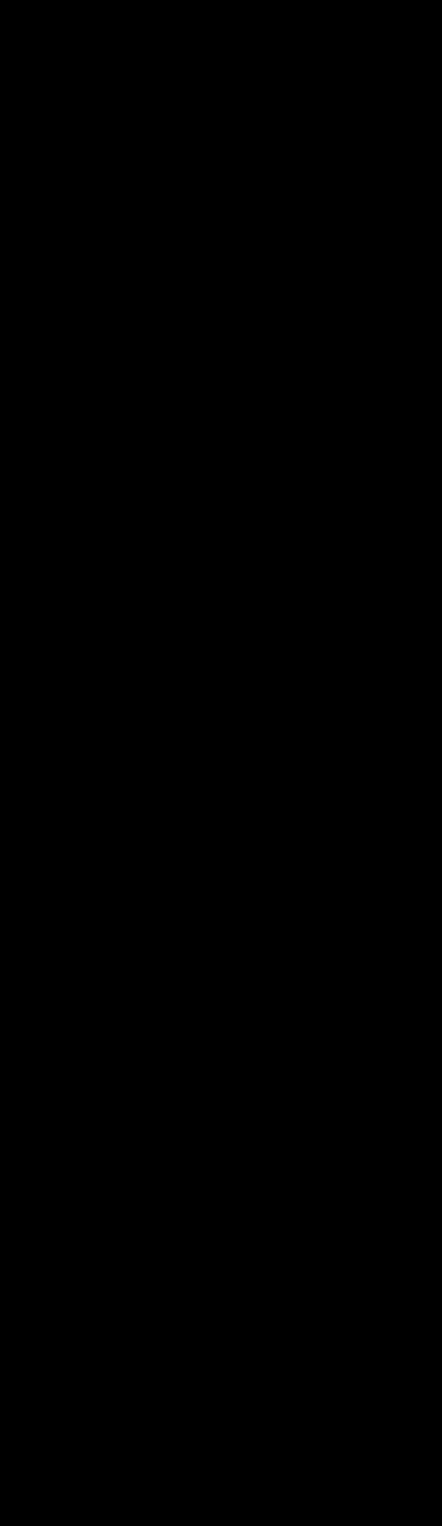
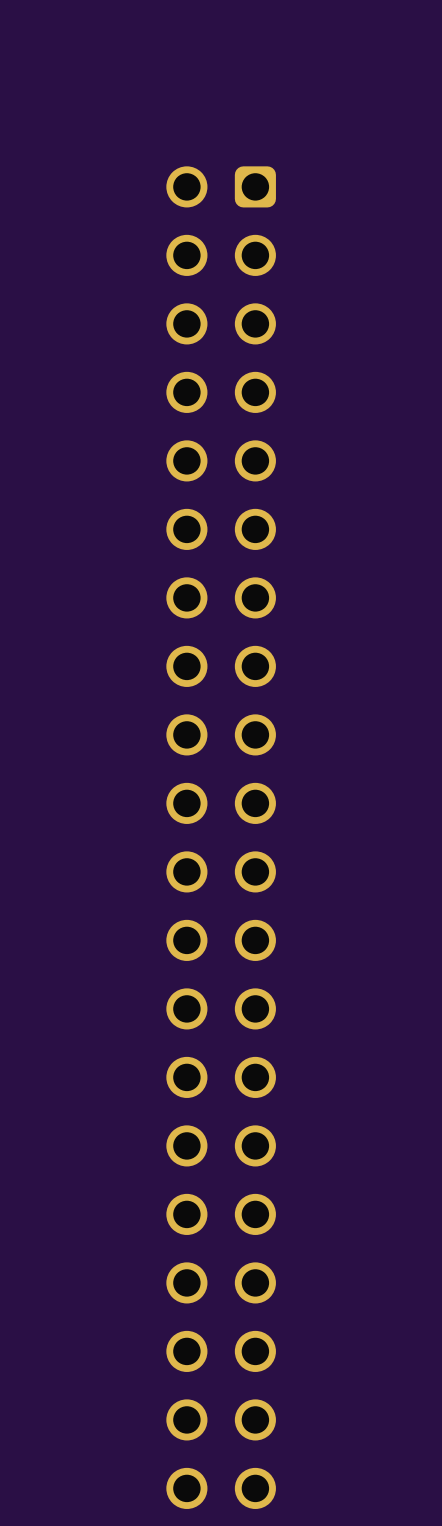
part: none -> (221, 837)

